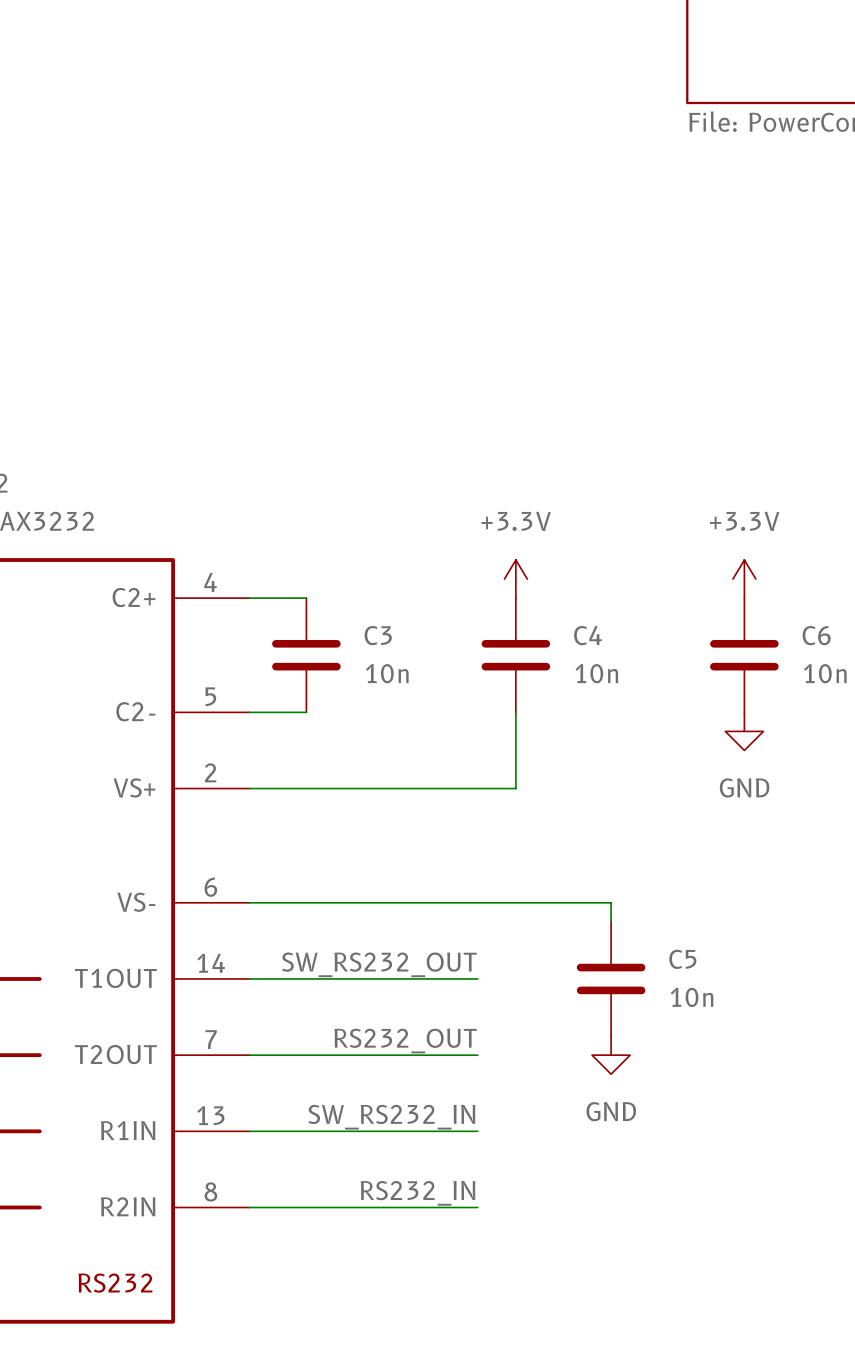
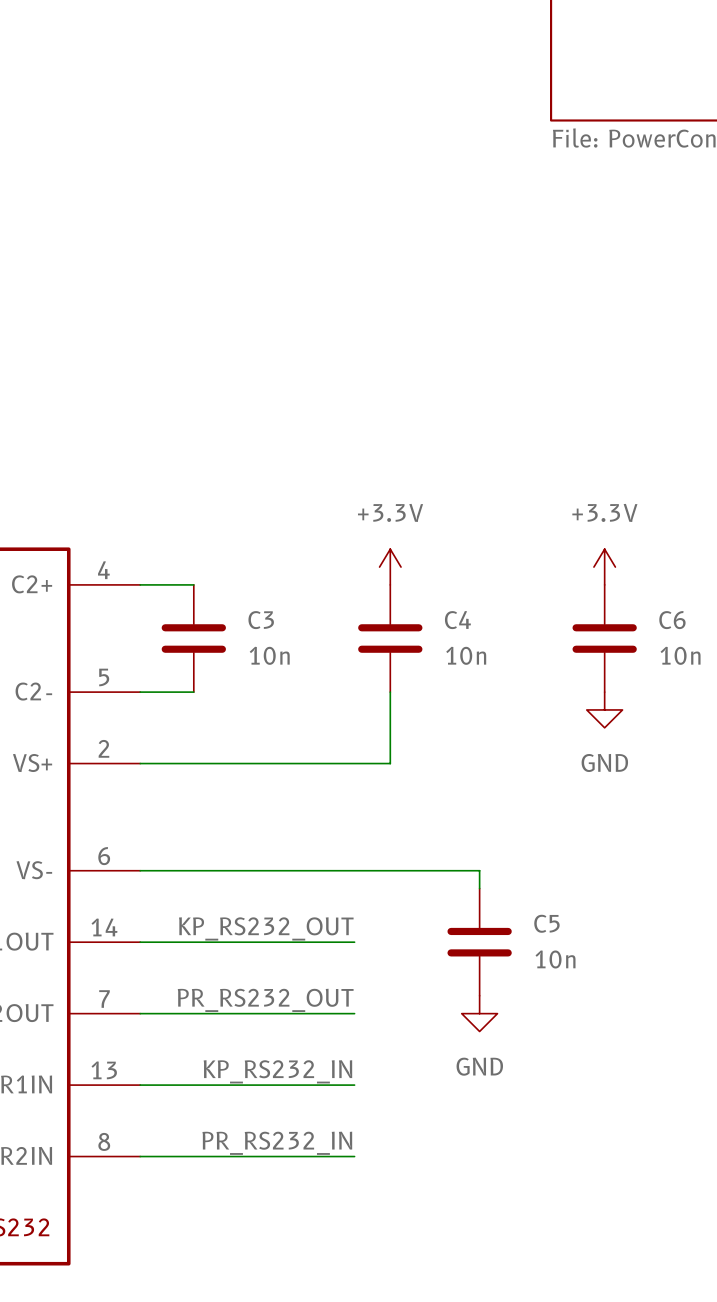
label: SW_RS232_OUT (379, 964) -> KP_RS232_OUT (266, 928)
label: RS232_OUT (405, 1041) -> PR_RS232_OUT (265, 1000)
label: SW_RS232_IN (391, 1117) -> KP_RS232_IN (277, 1071)
label: RS232_IN (417, 1193) -> PR_RS232_IN (277, 1143)

